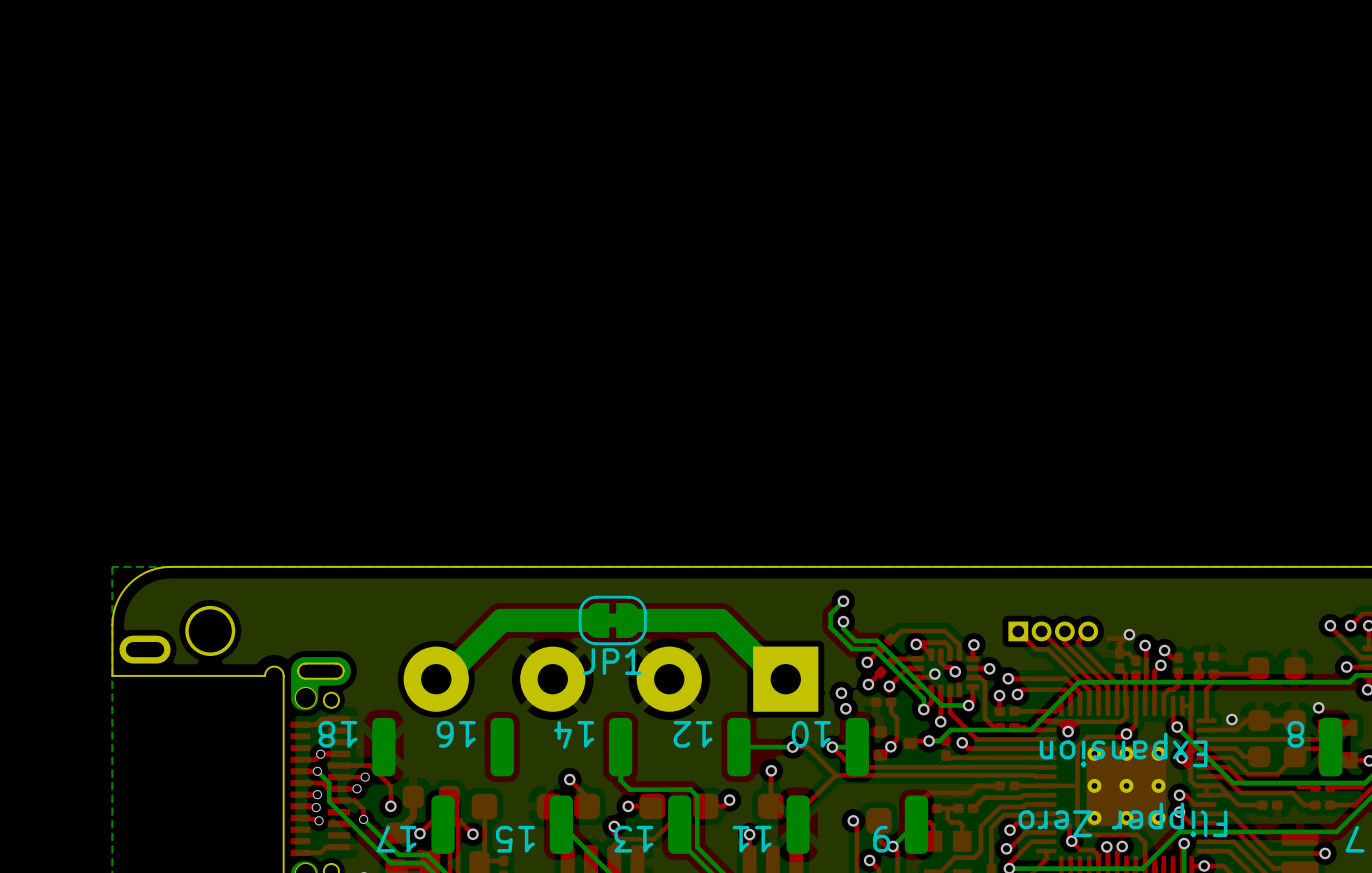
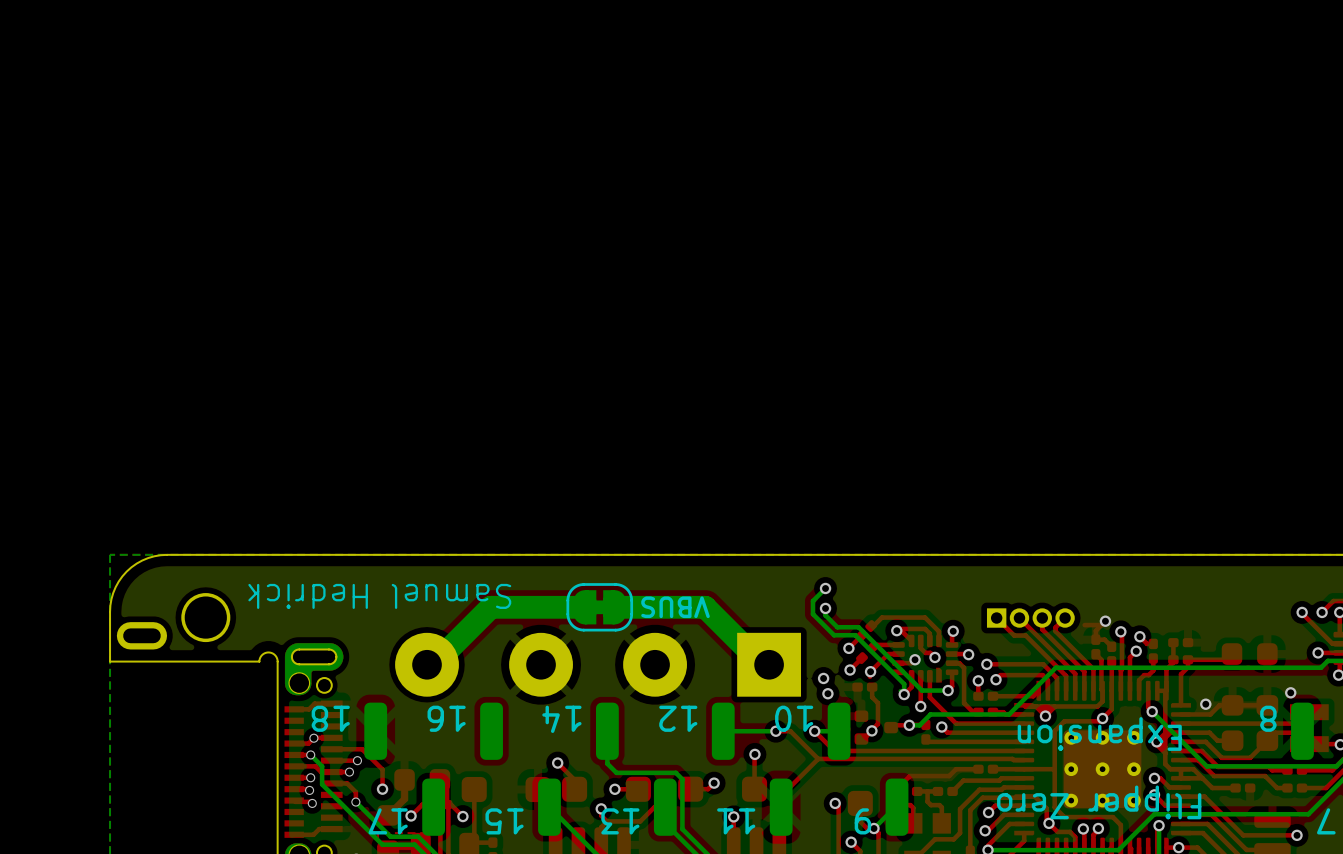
text: none -> Samuel Hedrick (379, 596)
text: none -> VBUS (675, 607)
JP1 name: JP1 (612, 661) -> none

